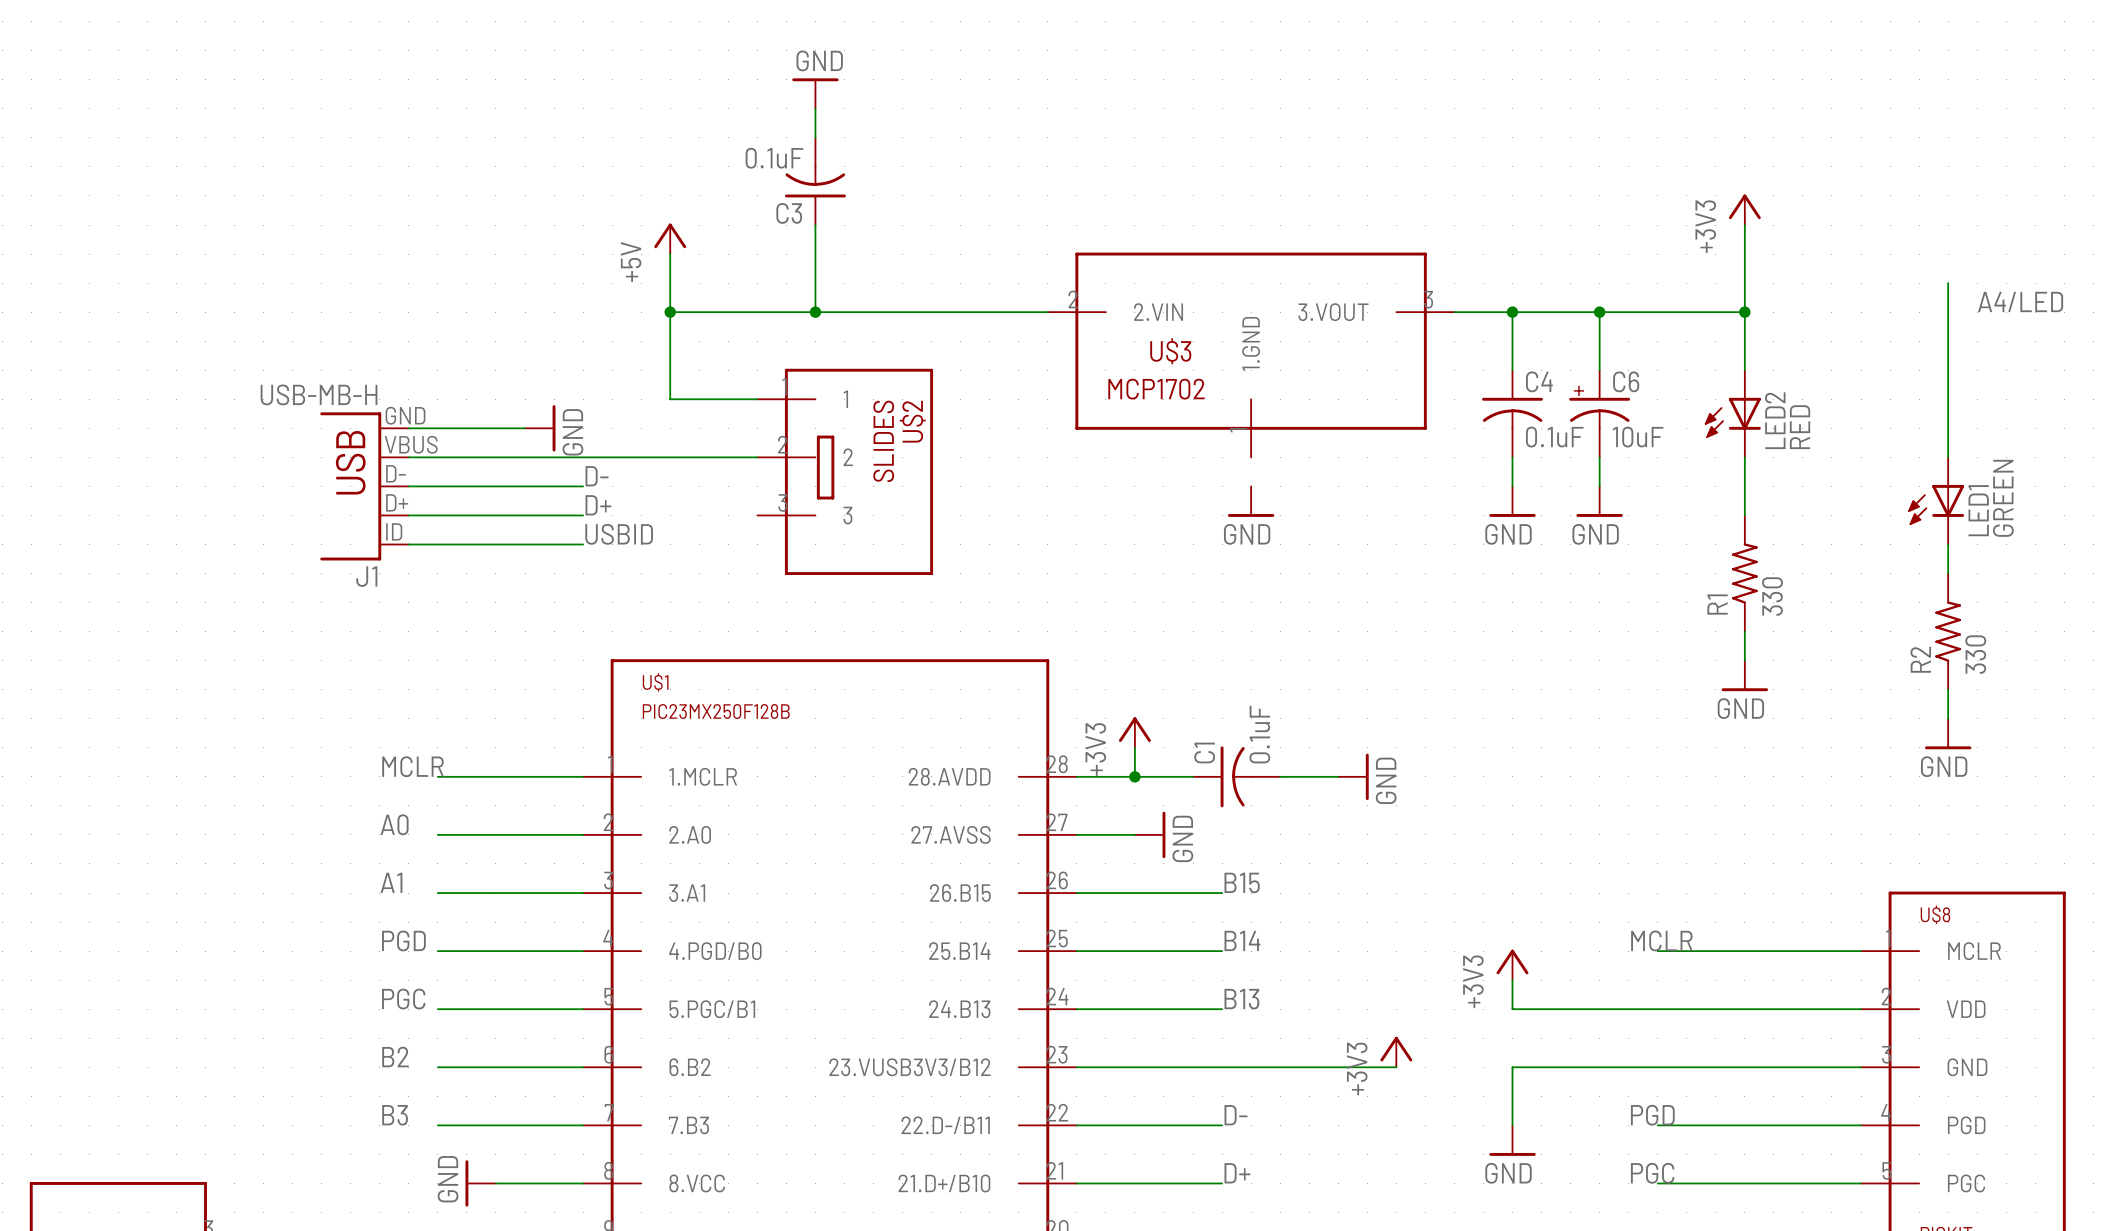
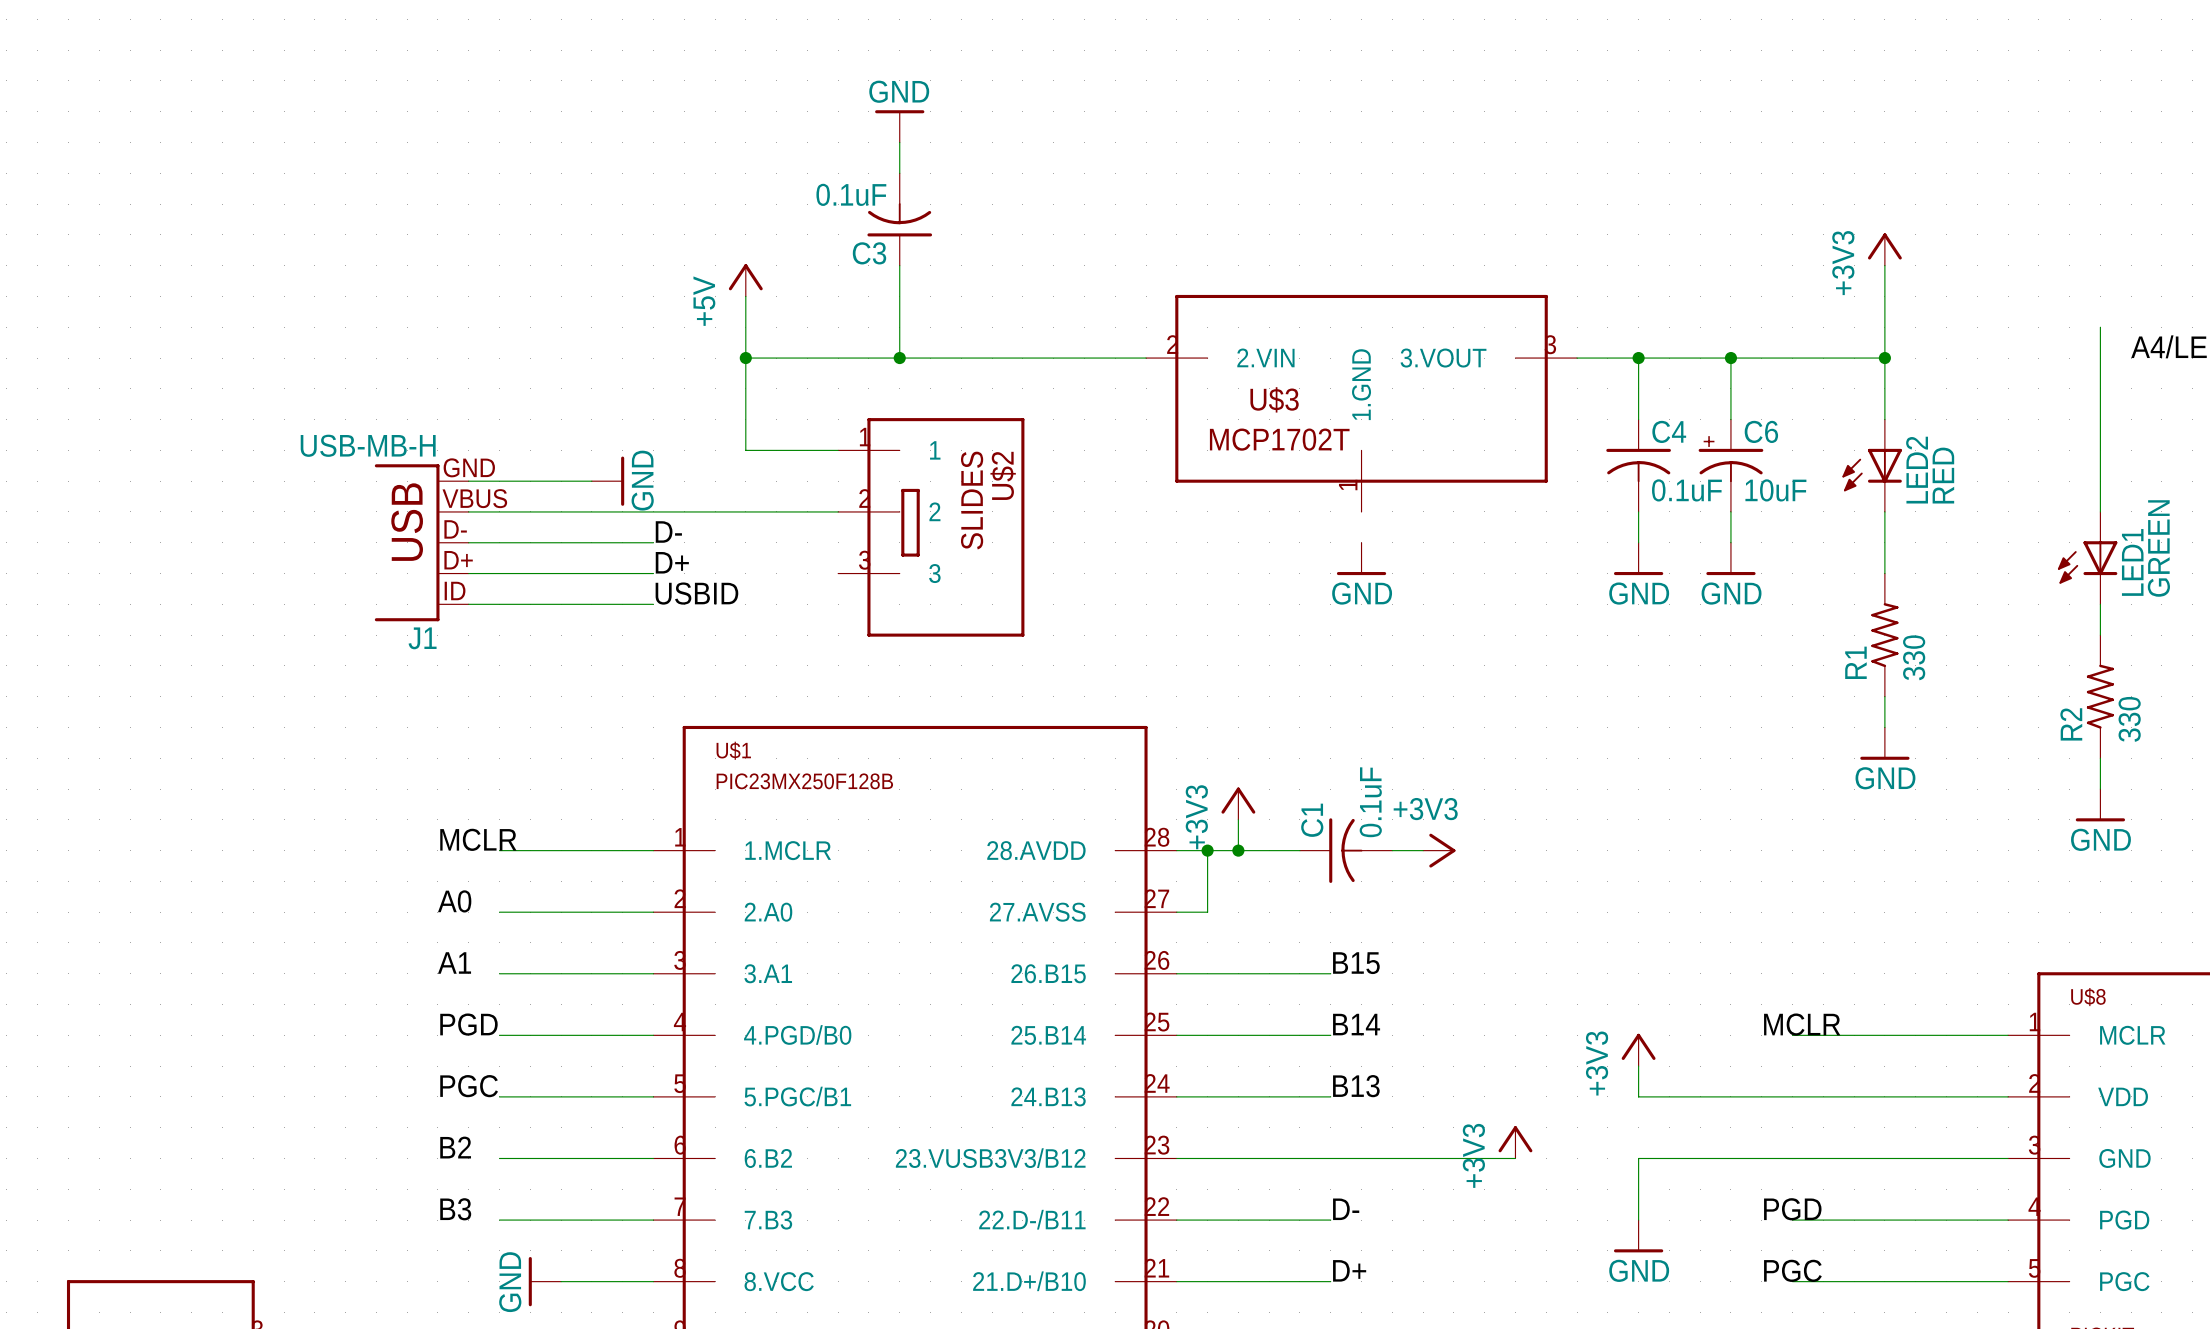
U$3 value: MCP1702 (1156, 389) -> MCP1702T (1279, 439)
junction: none -> (1207, 850)
power symbol: none -> +3V3 (1439, 850)
power symbol: GND (1353, 776) -> none
wire: (1105, 834) (1134, 834) -> (1207, 912) (1207, 850)
power symbol: GND (1150, 834) -> none

